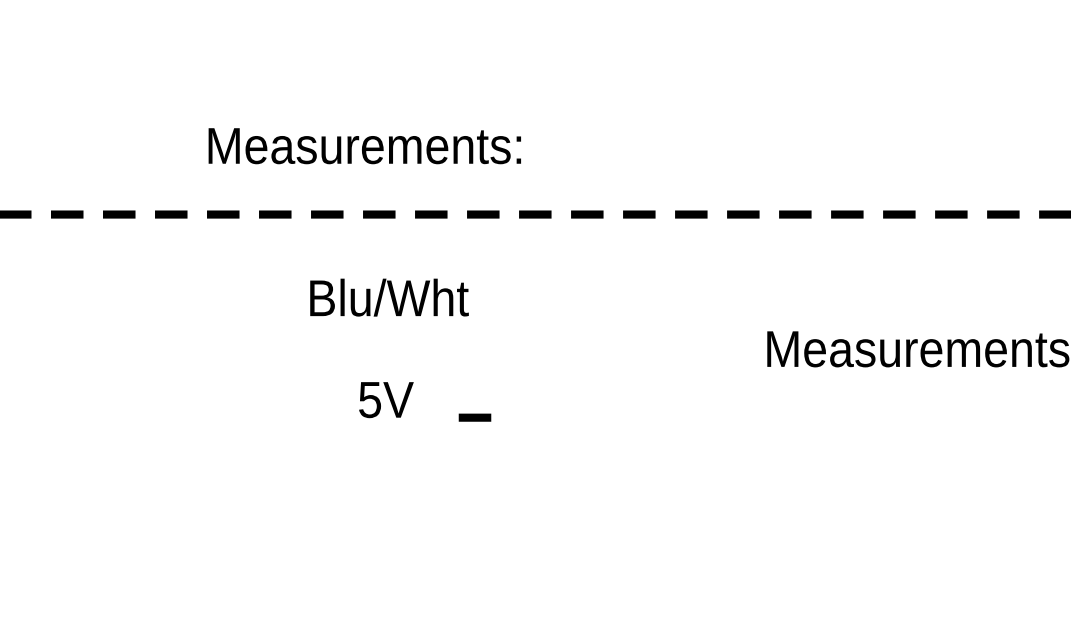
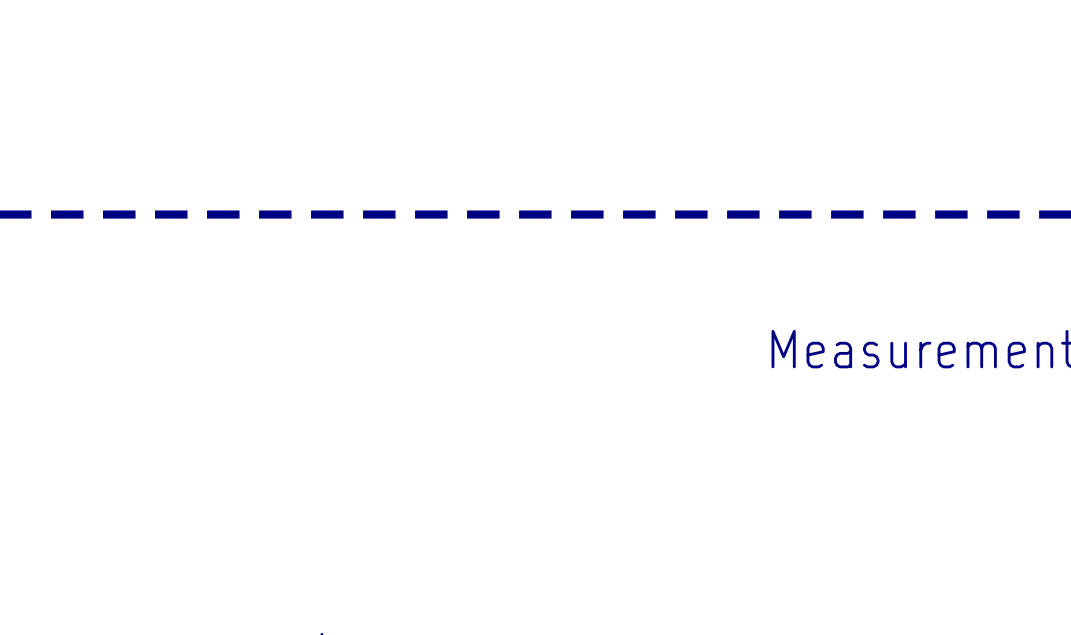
text: Measurements: (364, 146) -> none
text: Blu/Wht (389, 297) -> none
text: 5V (386, 400) -> none
line: (458, 417) (509, 417) -> none

